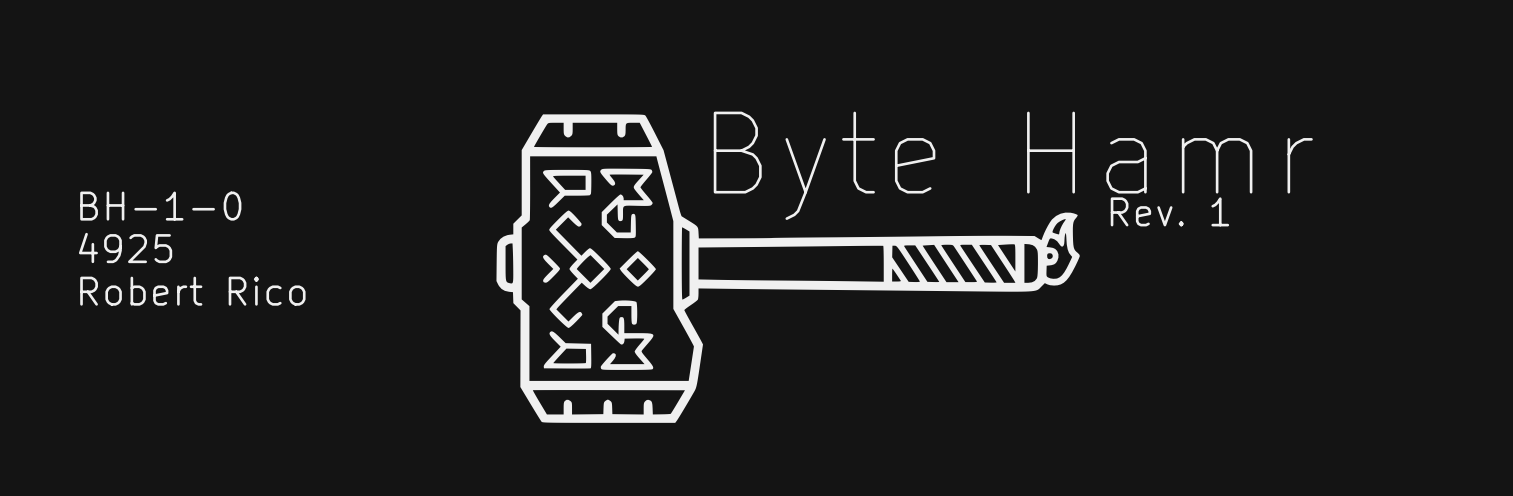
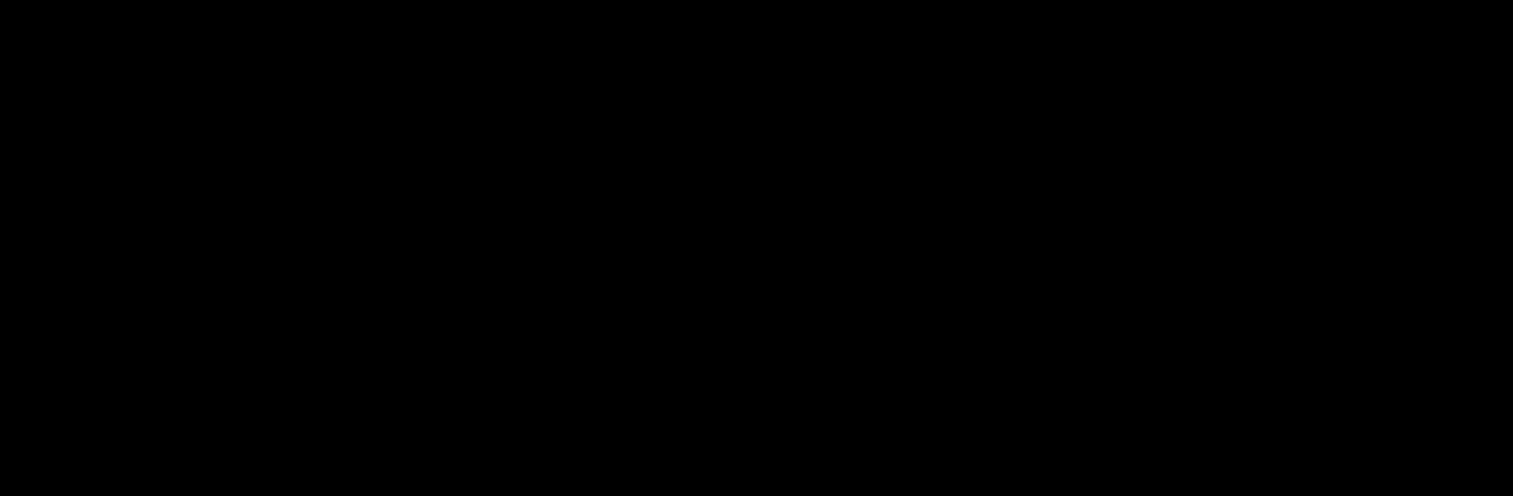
drawing: [496, 114, 1080, 423] -> none
text: Byte Hamr (1013, 165) -> none
text: BH-1-0 (160, 206) -> none
text: Rev. 1 (1169, 211) -> none
text: 4925 (125, 247) -> none
text: Robert Rico (192, 291) -> none

